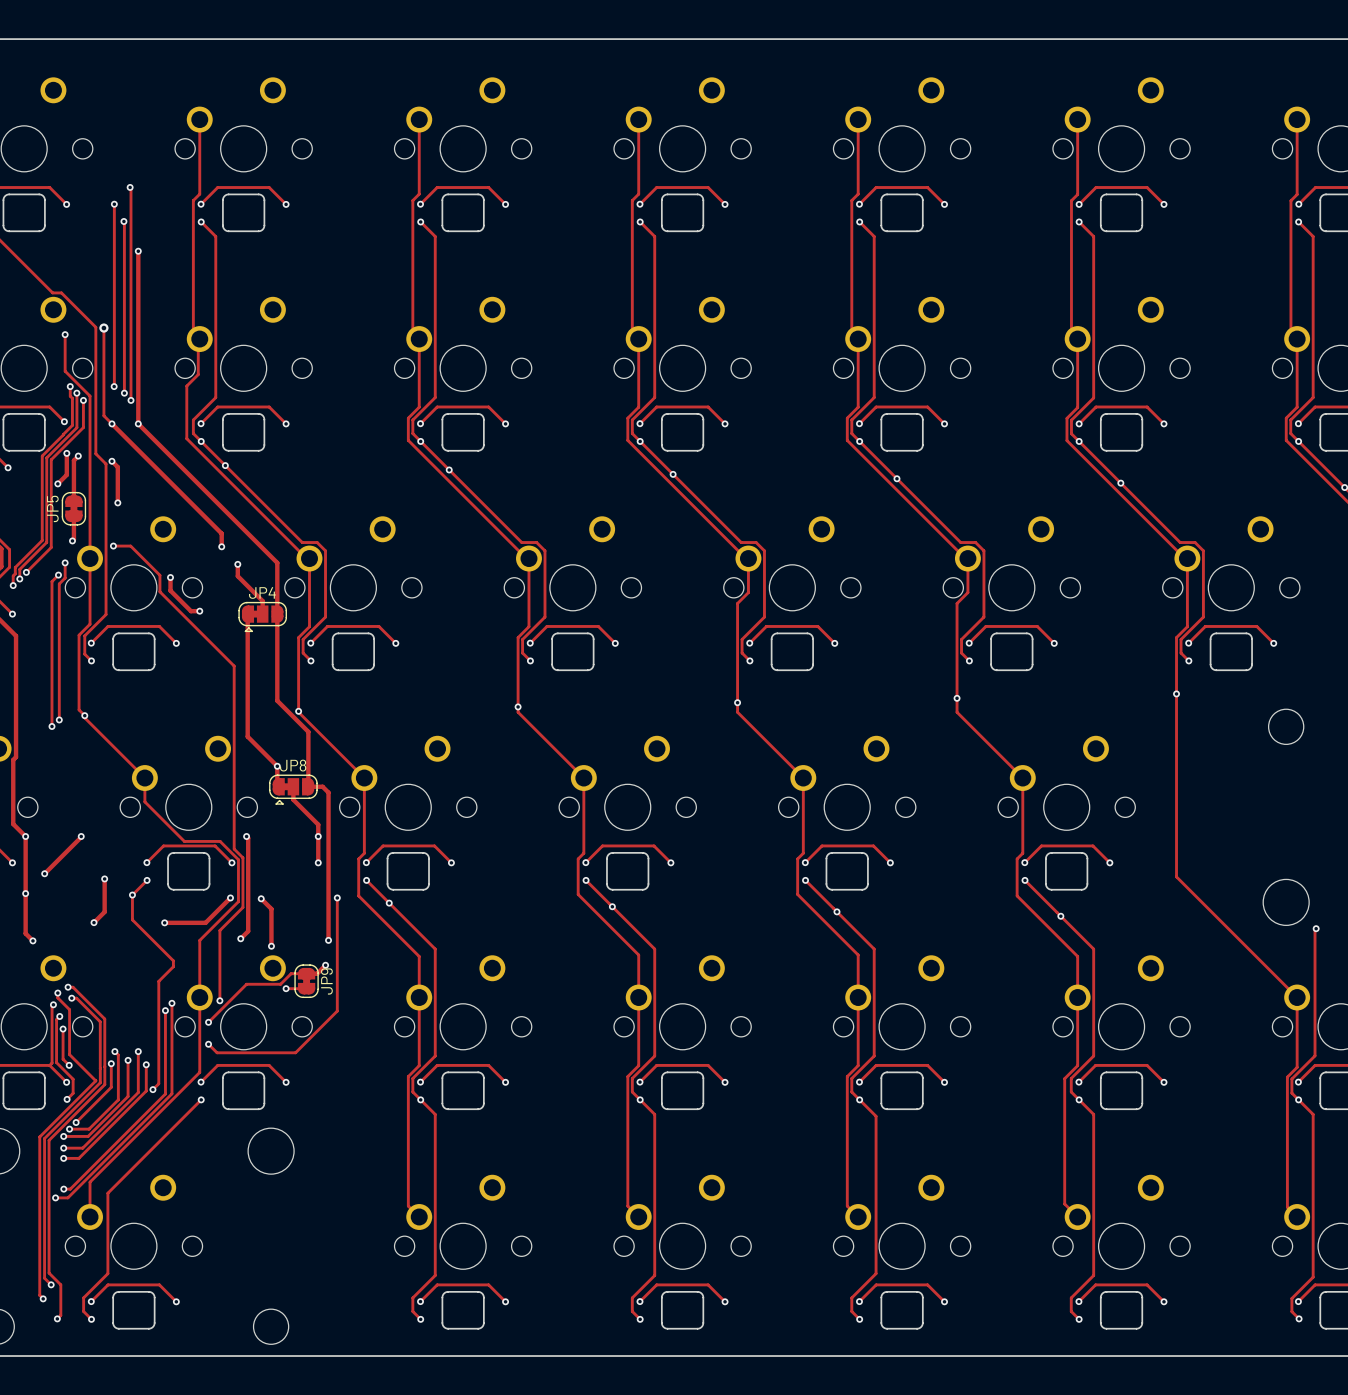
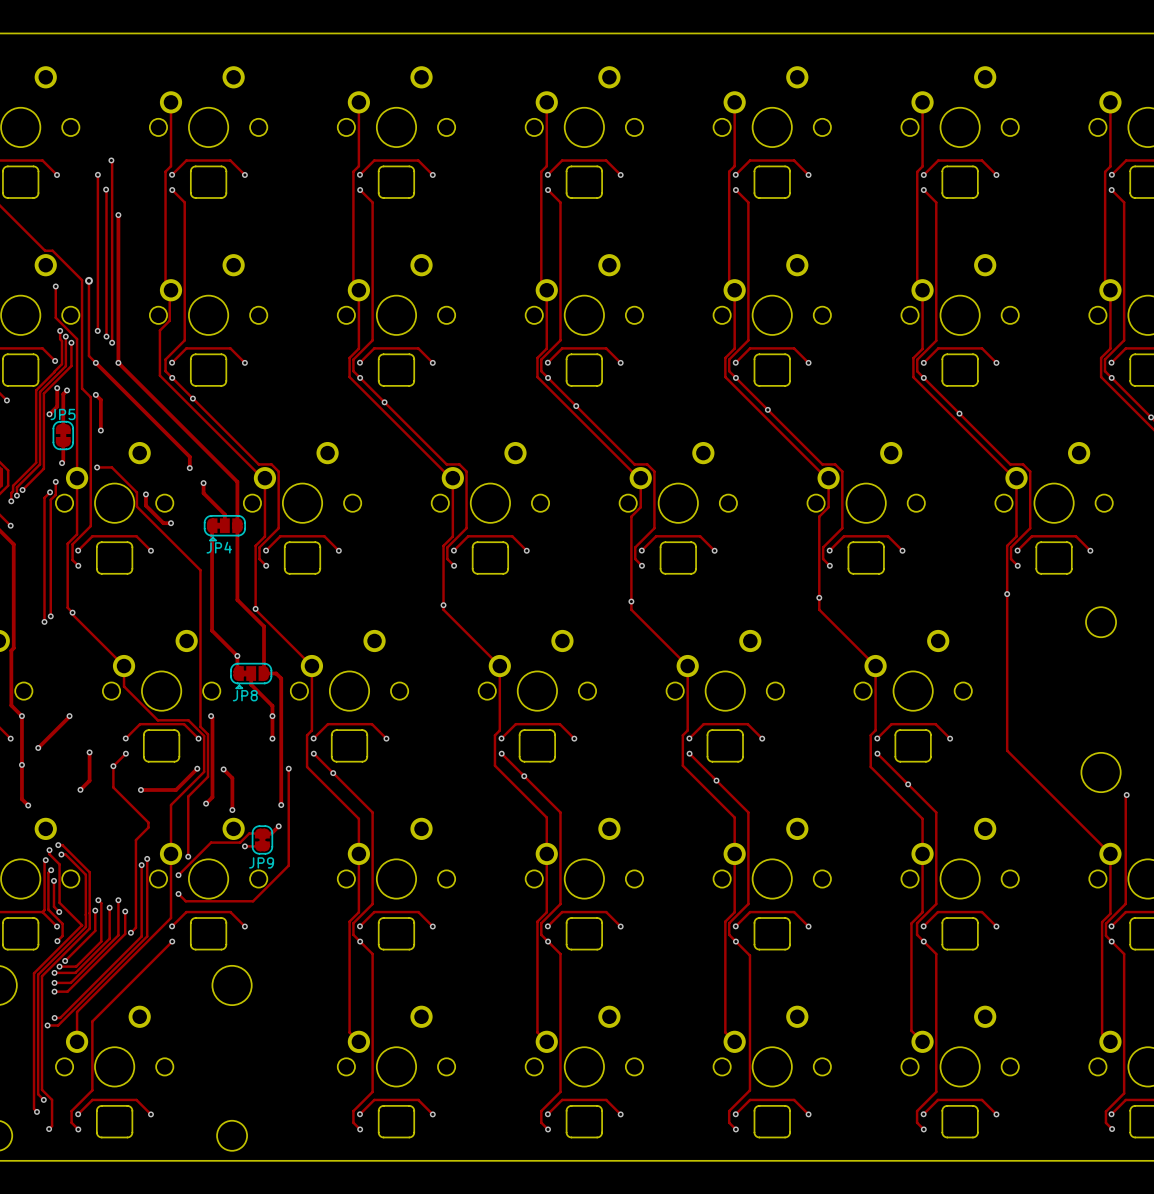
JP5 name rotation: 0° (52, 508) -> 90° clockwise (63, 414)
JP4 name position: JP4 (262, 592) -> JP4 (219, 547)
JP8 name position: JP8 (293, 765) -> JP8 (245, 695)
JP9 name rotation: 0° (326, 981) -> 90° clockwise (261, 862)

